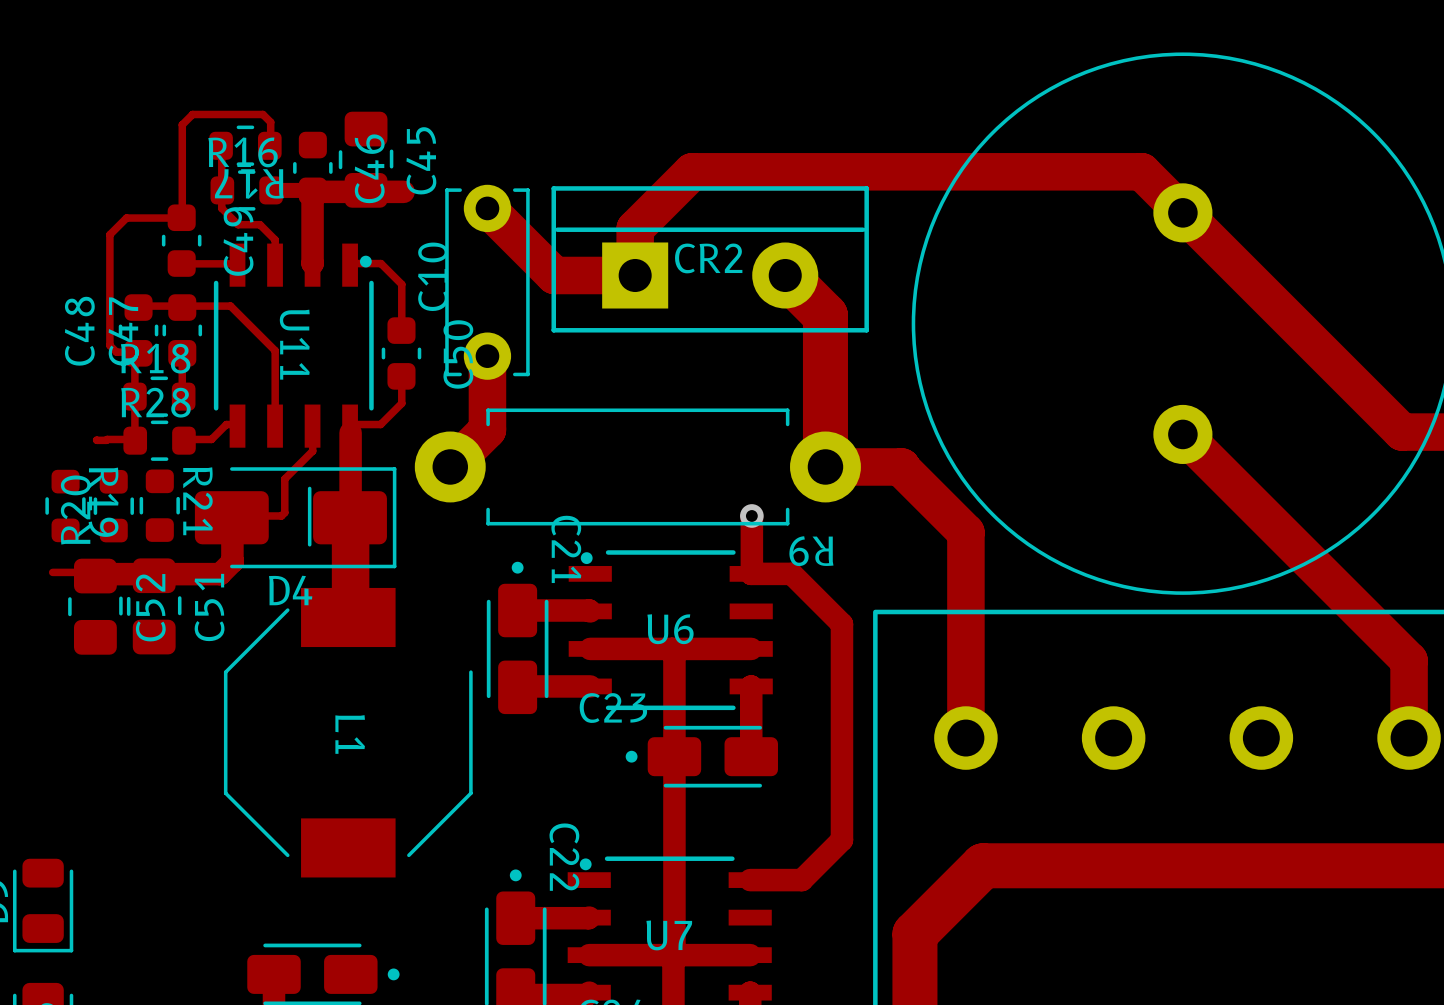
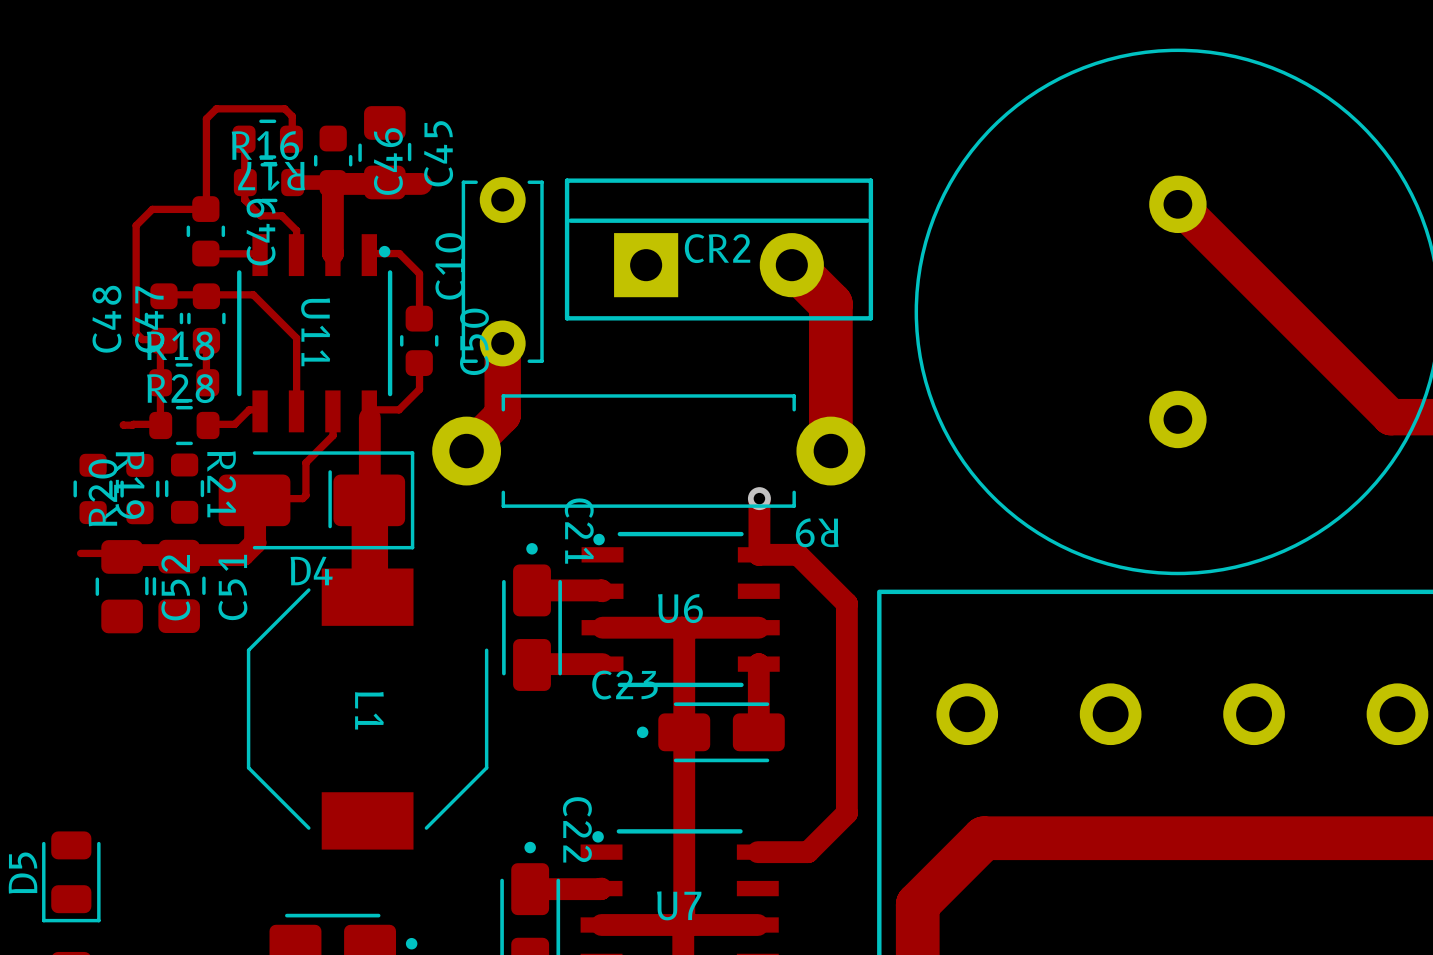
track: (487, 208) (554, 275) (635, 275) (635, 228) (692, 171) (1141, 171) (1182, 212) -> none
track: (1182, 434) (1409, 660) (1409, 738) -> none
track: (825, 466) (901, 466) (965, 532) (965, 738) -> none

